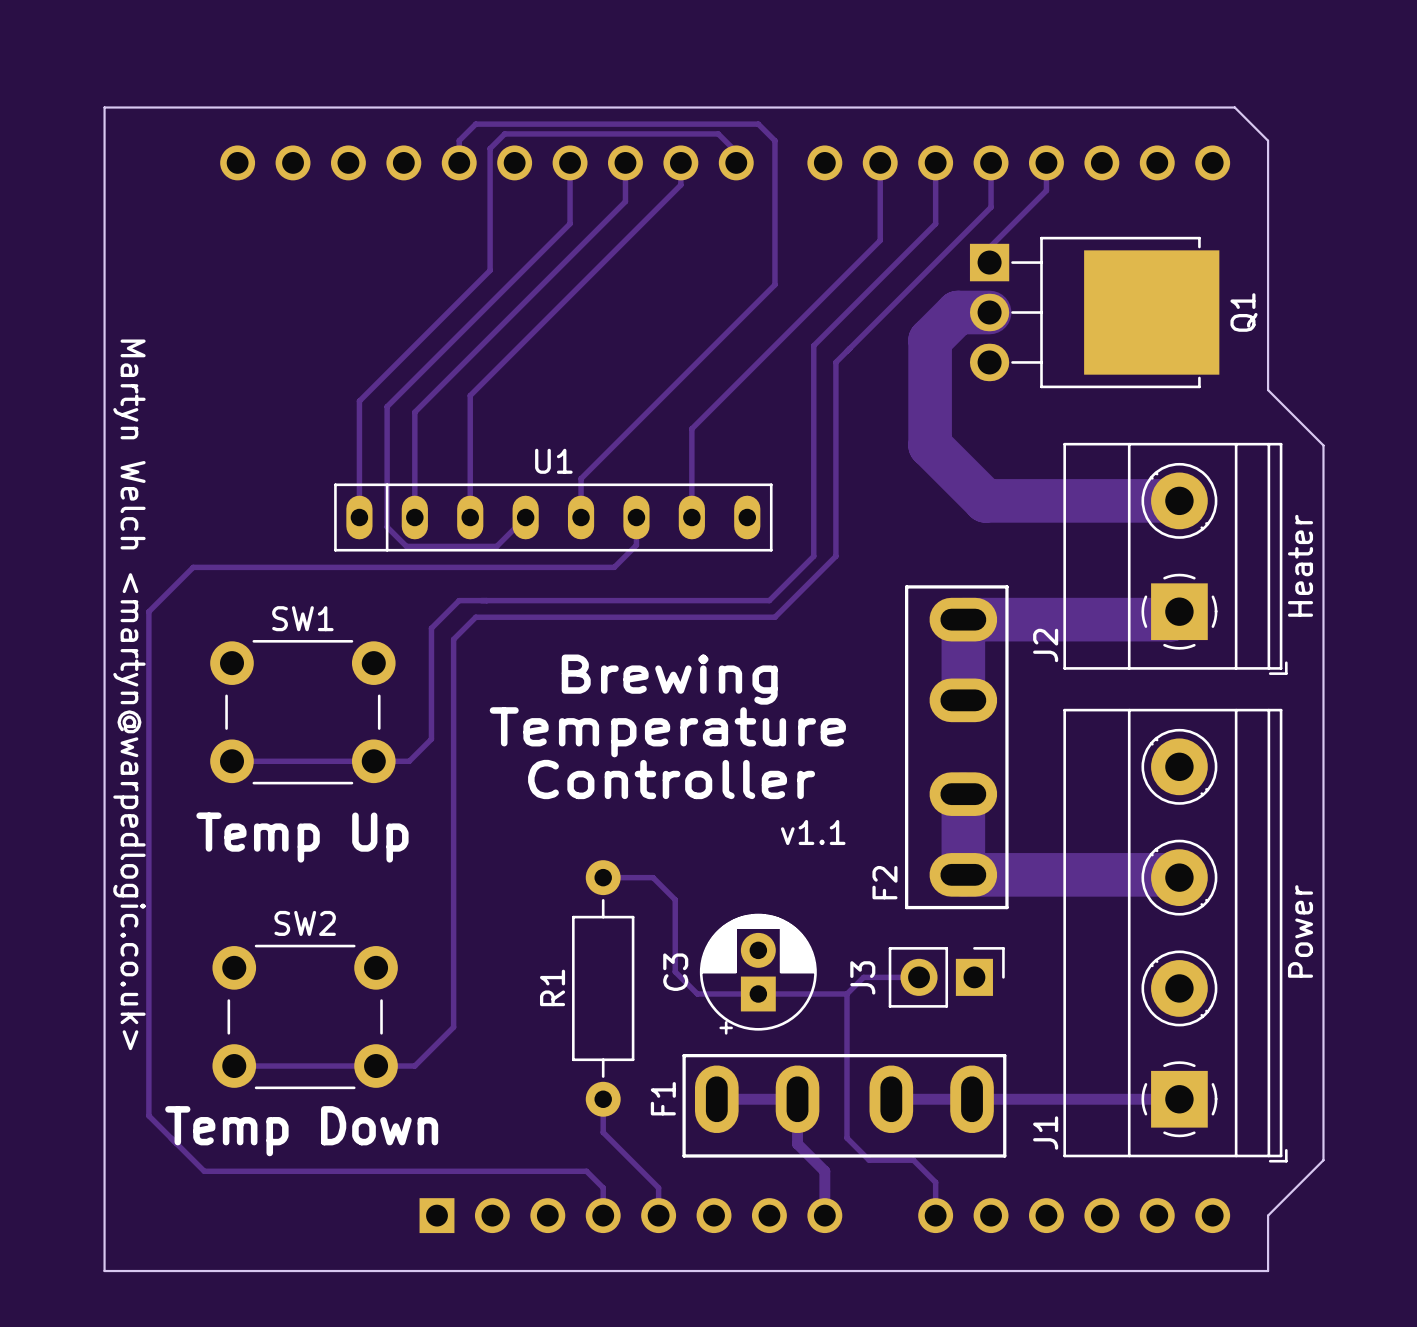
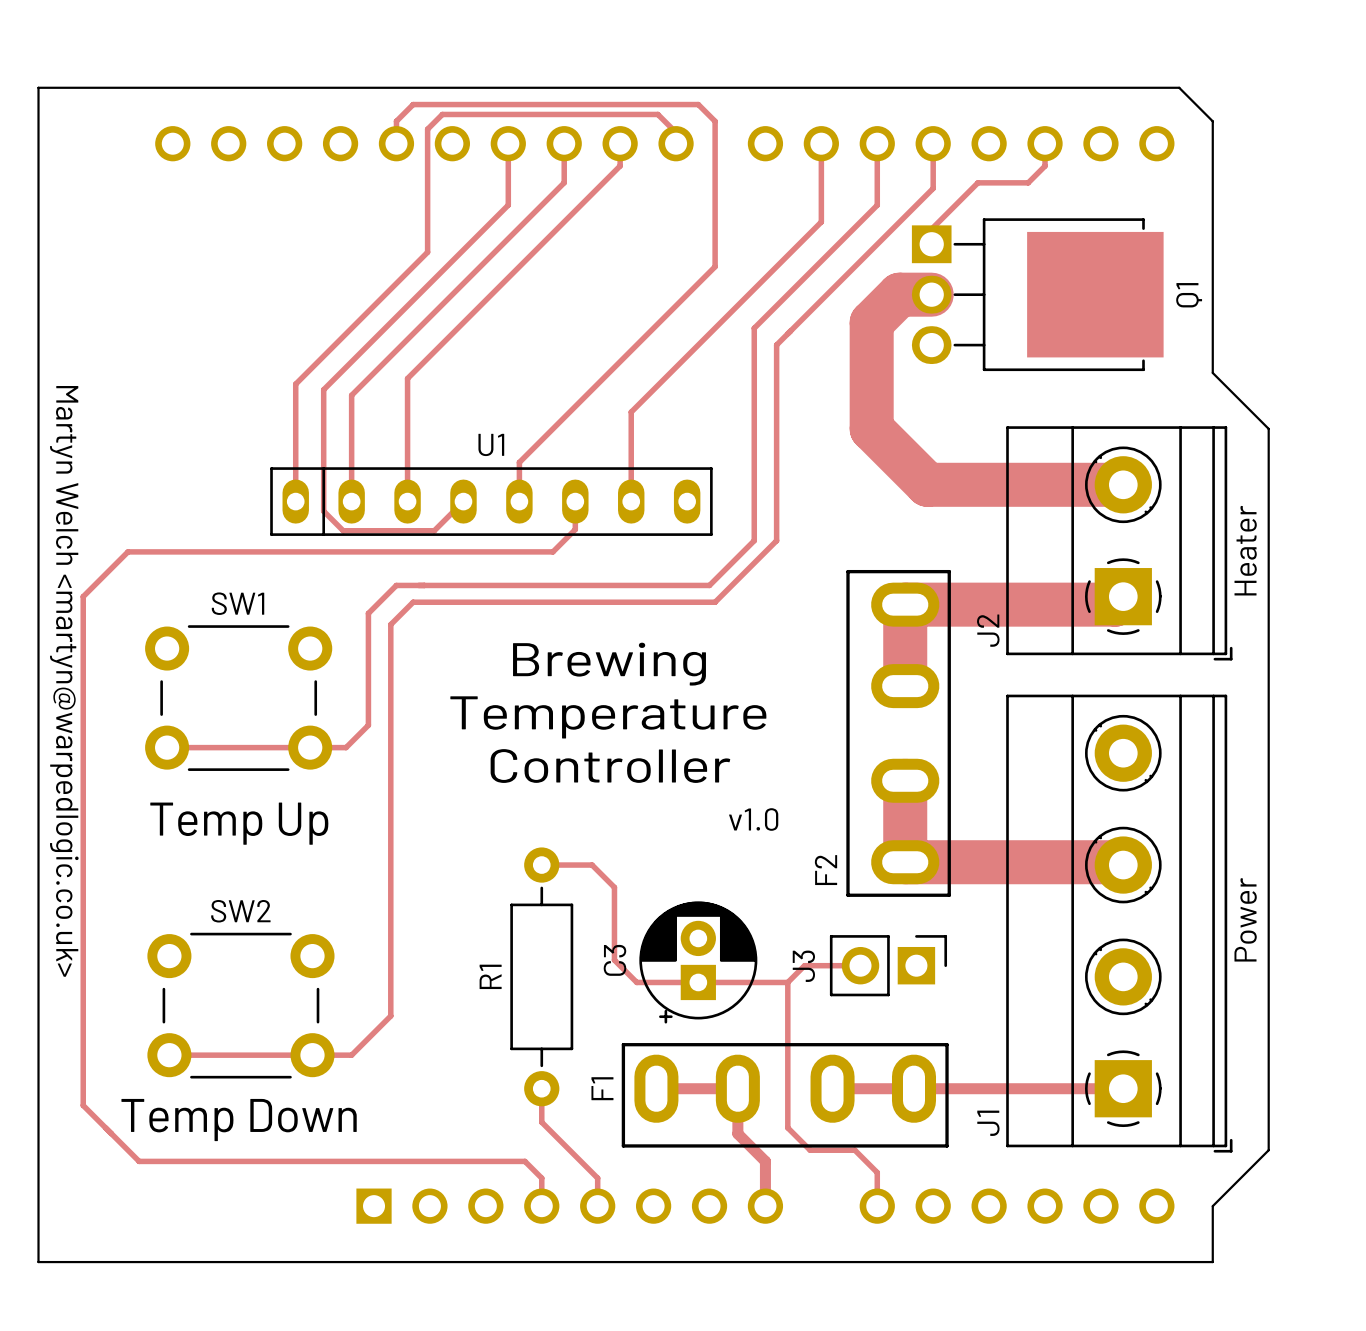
track: (1046, 162) (1046, 190) (1035, 201) -> (1045, 143) (1045, 166) (1028, 182) (977, 182)
text: v1.1 (813, 832) -> v1.0 (753, 819)

